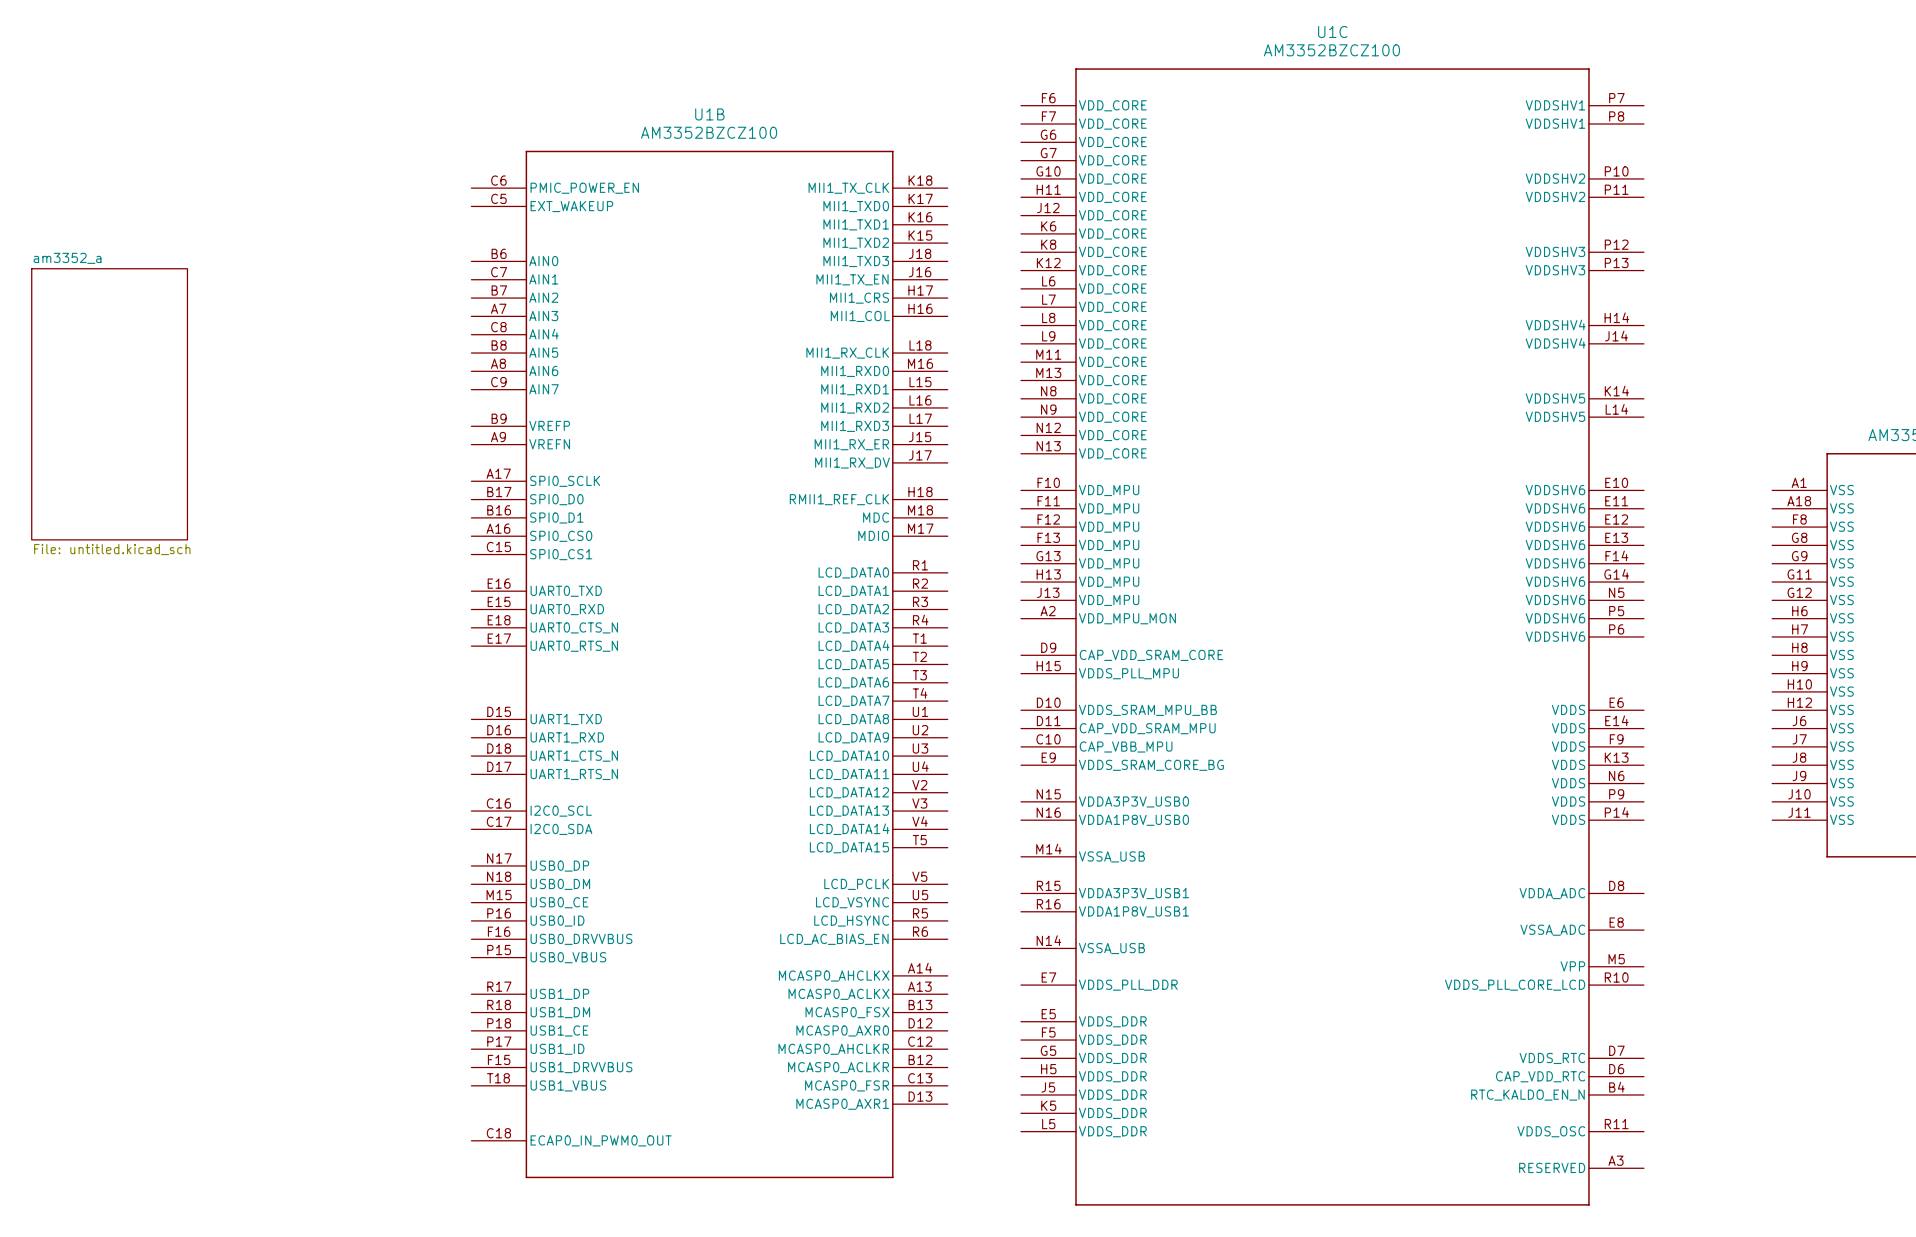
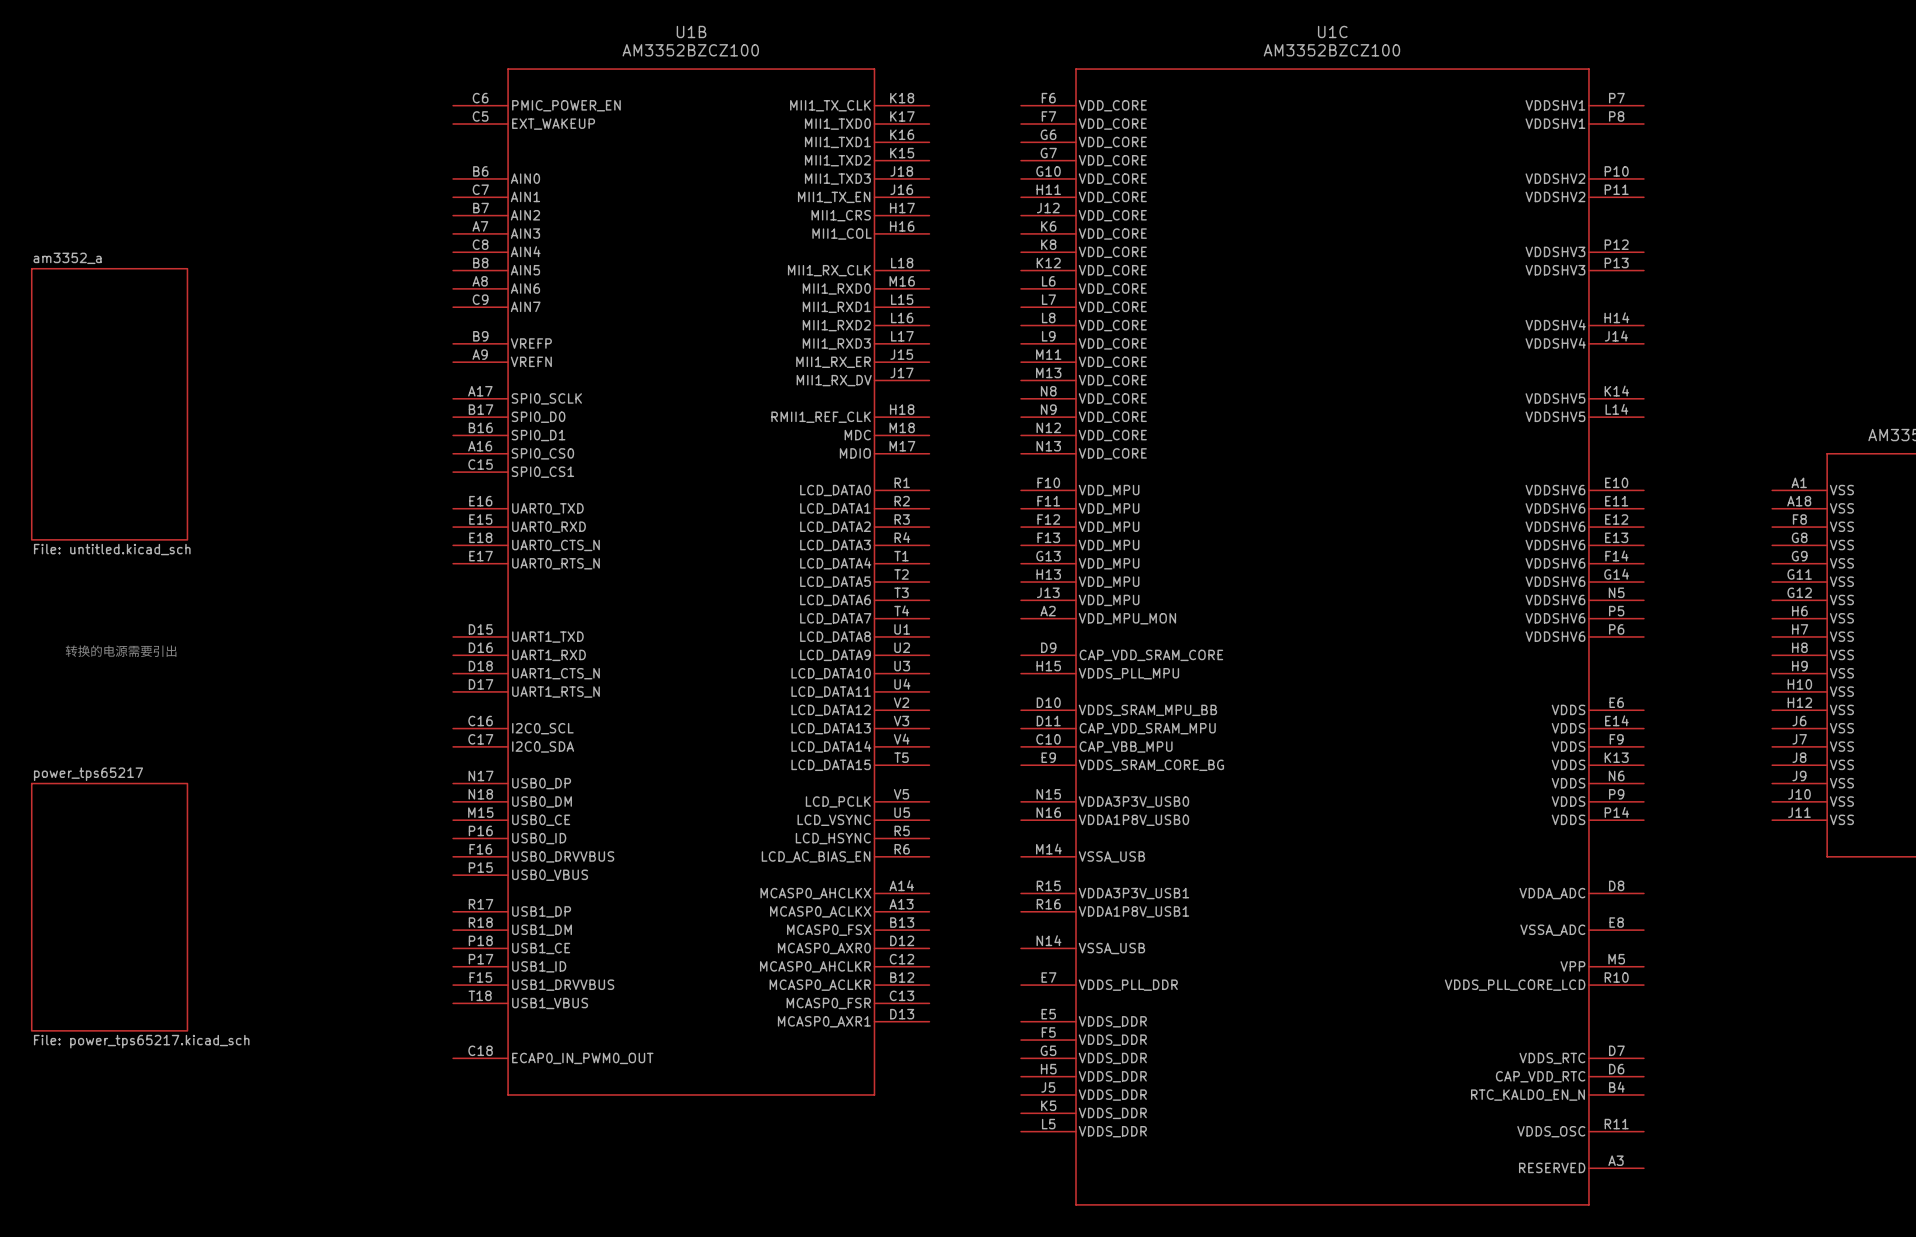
text: none -> 转换的电源需要引出 (121, 651)
U1B position: (709, 664) -> (691, 582)
sheet power_tps65217: none -> File: power_tps65217.kicad_sch (109, 907)

